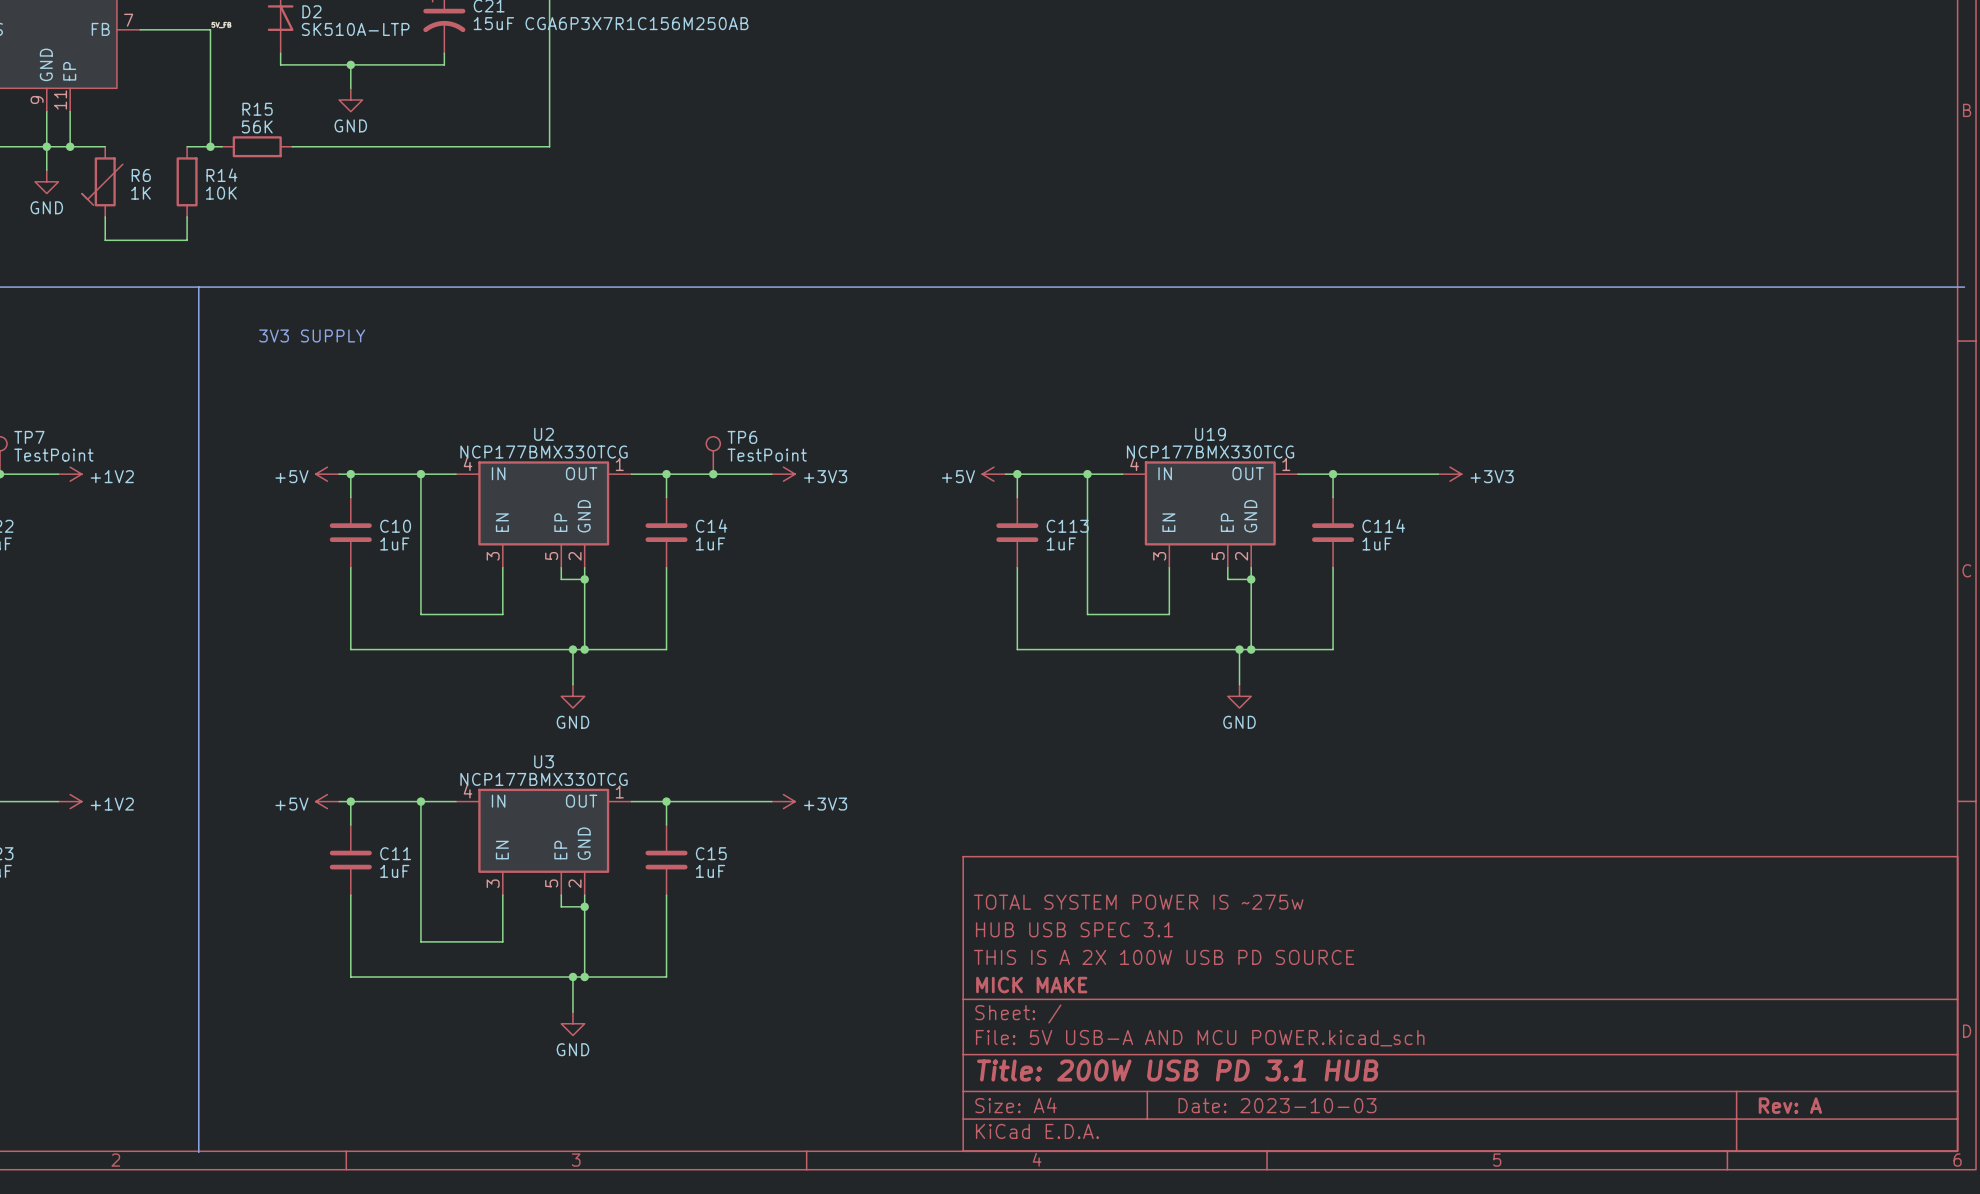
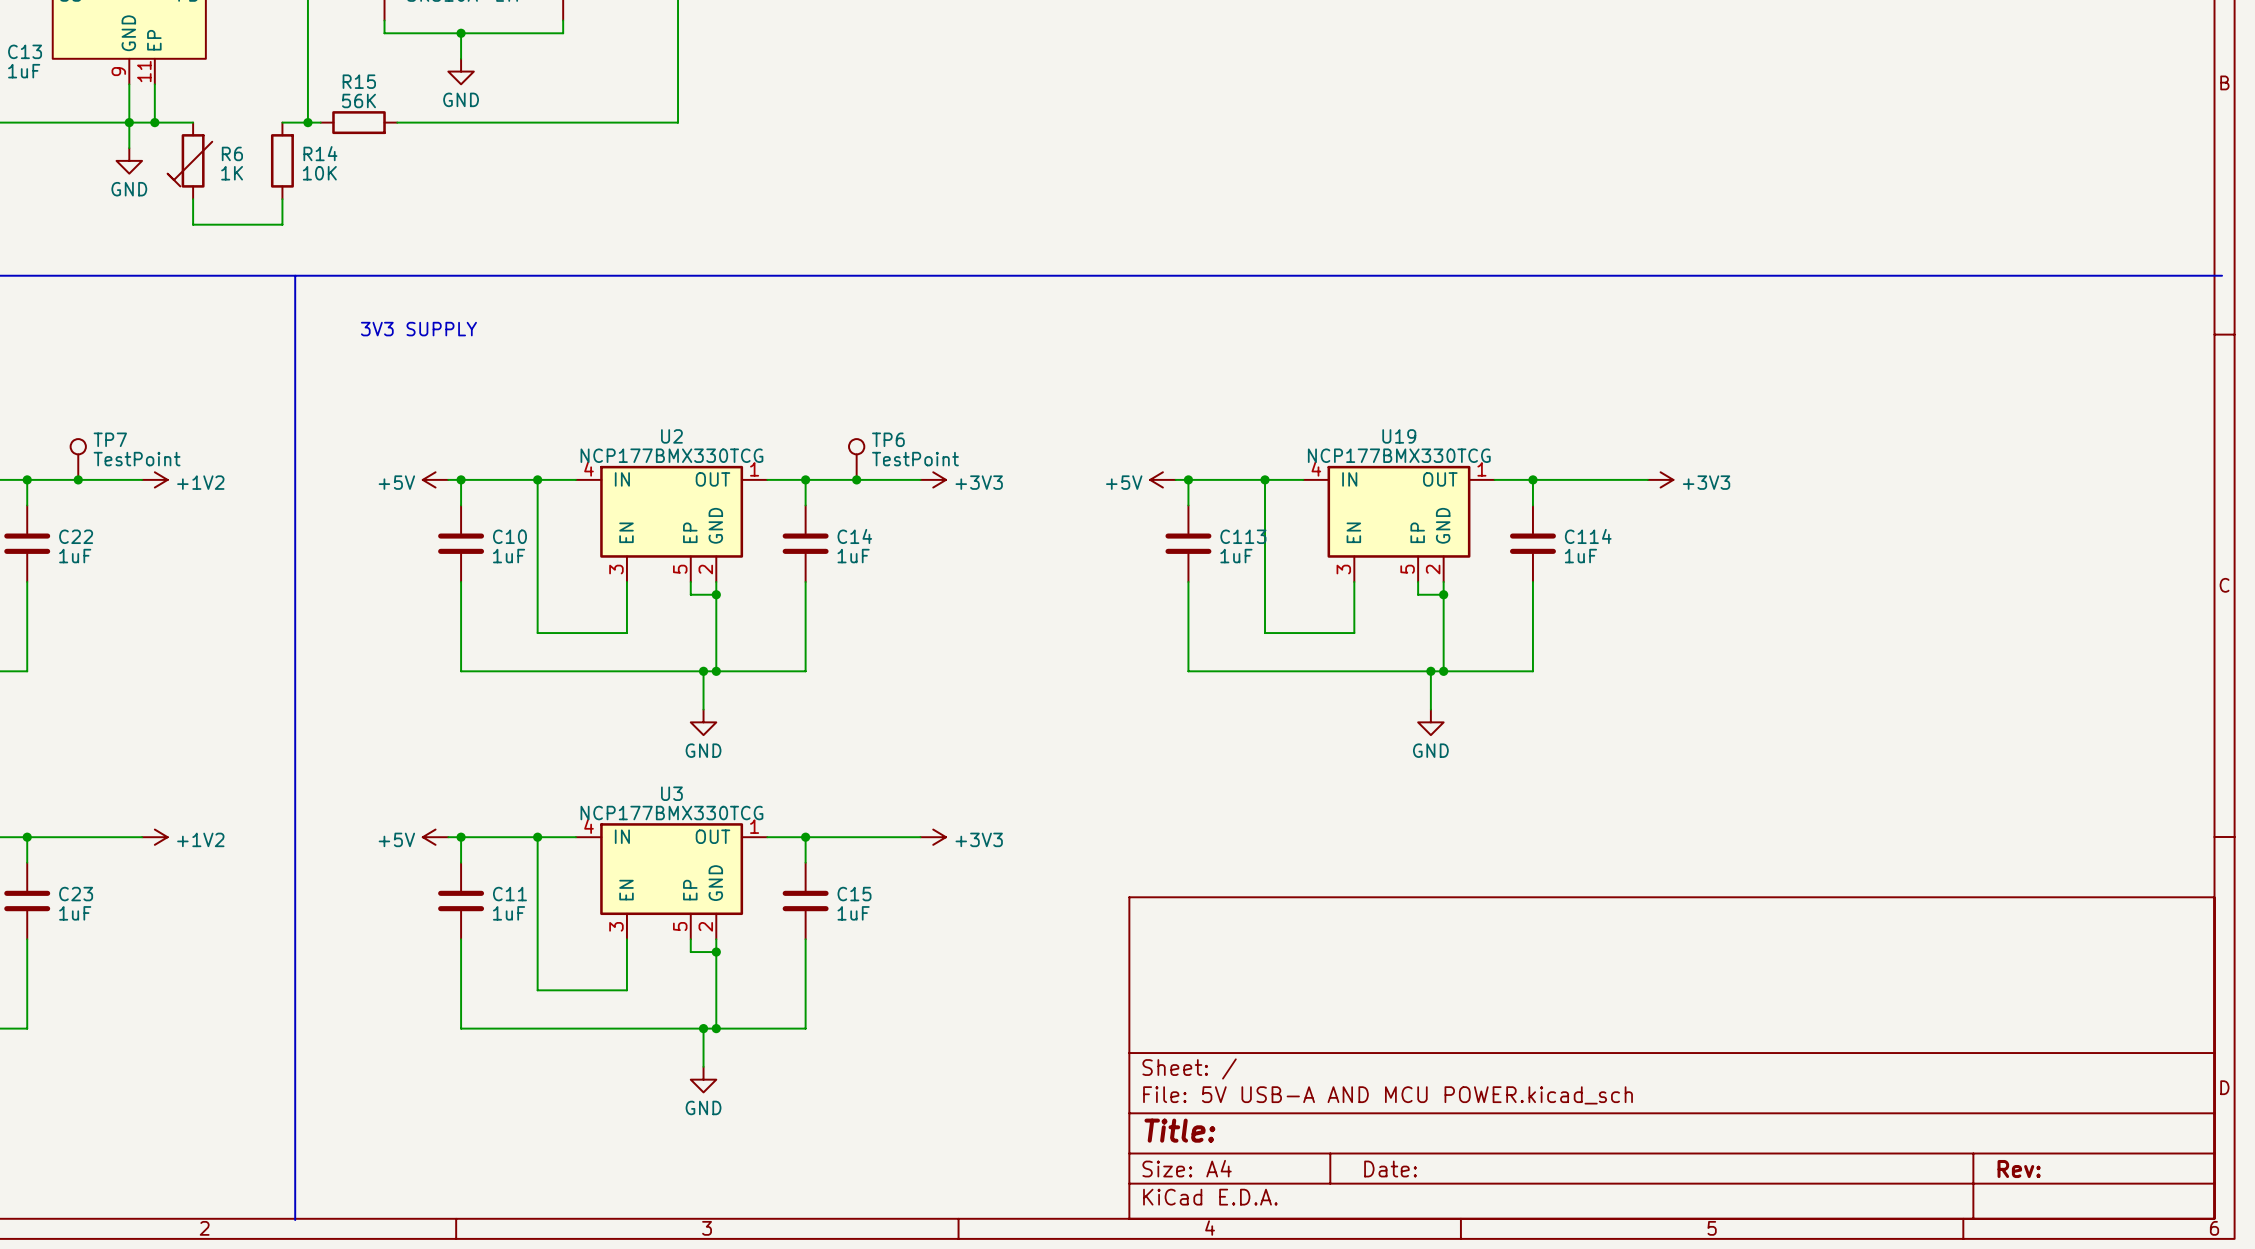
title block: TOTAL SYSTEM POWER IS ~275w (1138, 902) -> none
title block: HUB USB SPEC 3.1 (1074, 929) -> none
title block: THIS IS A 2X 100W USB PD SOURCE (1164, 957) -> none
title block: MICK MAKE (1031, 985) -> none
title block: Title: 200W USB PD 3.1 HUB (1177, 1070) -> Title: (1179, 1130)
title block: Date: 2023-10-03 (1277, 1105) -> Date: (1390, 1169)
title block: Rev: A (1790, 1105) -> Rev: (2019, 1169)

